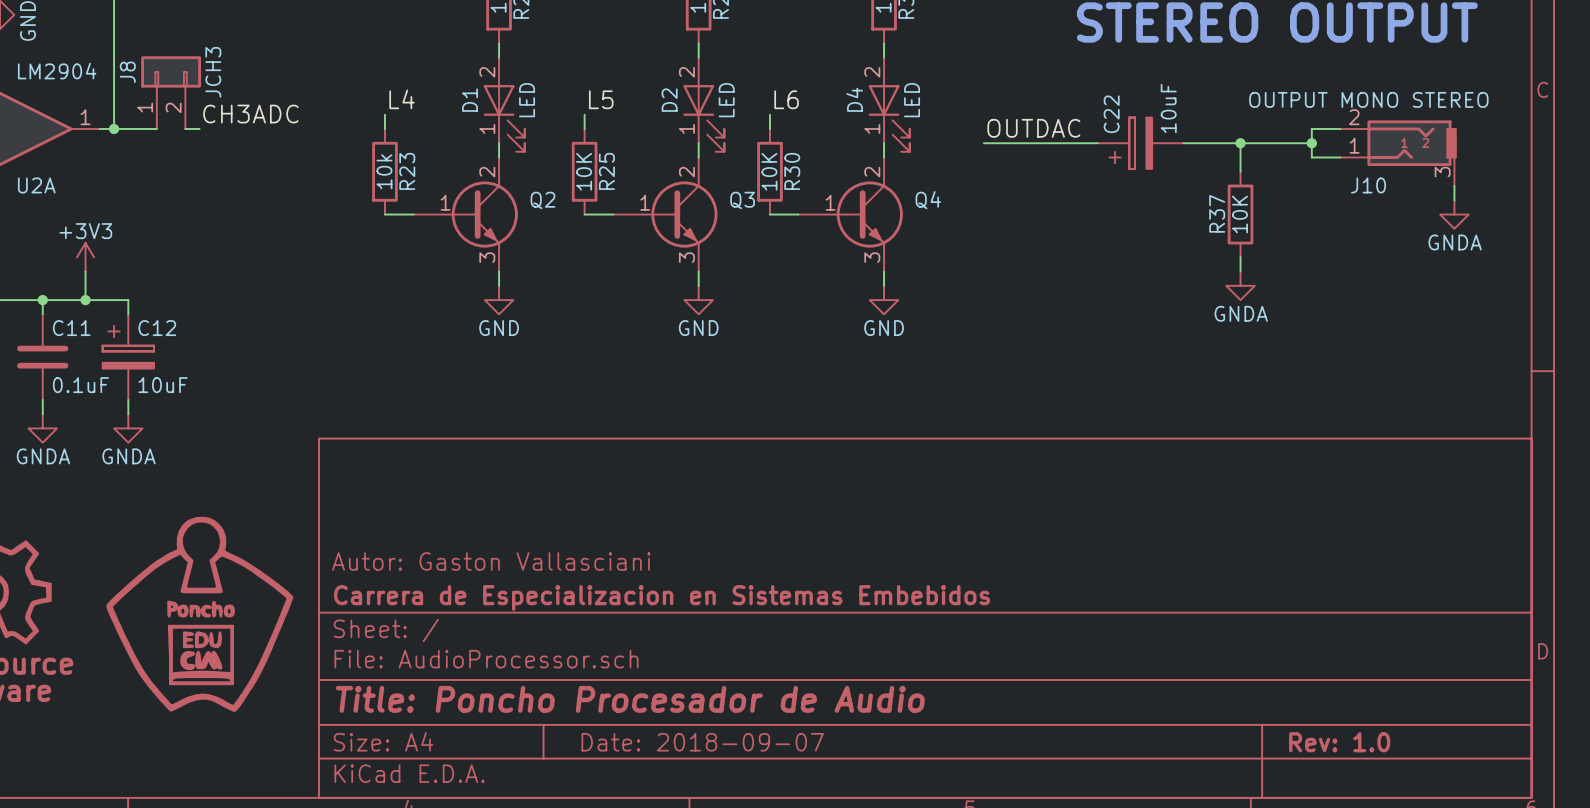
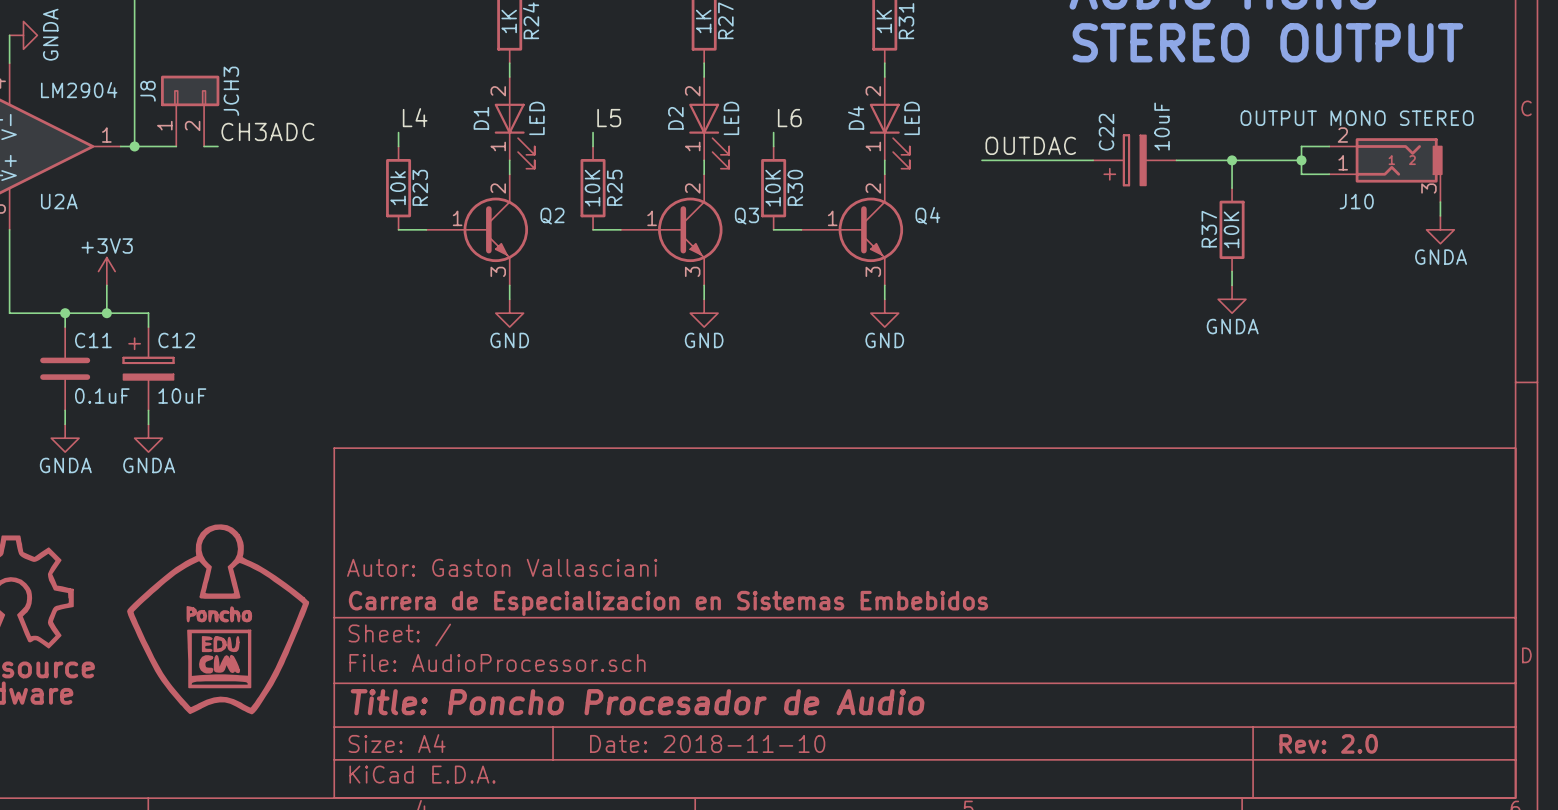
title block: Date: 2018-09-07 (702, 742) -> Date: 2018-11-10 (707, 743)
title block: Rev: 1.0 (1339, 742) -> Rev: 2.0 (1328, 743)

